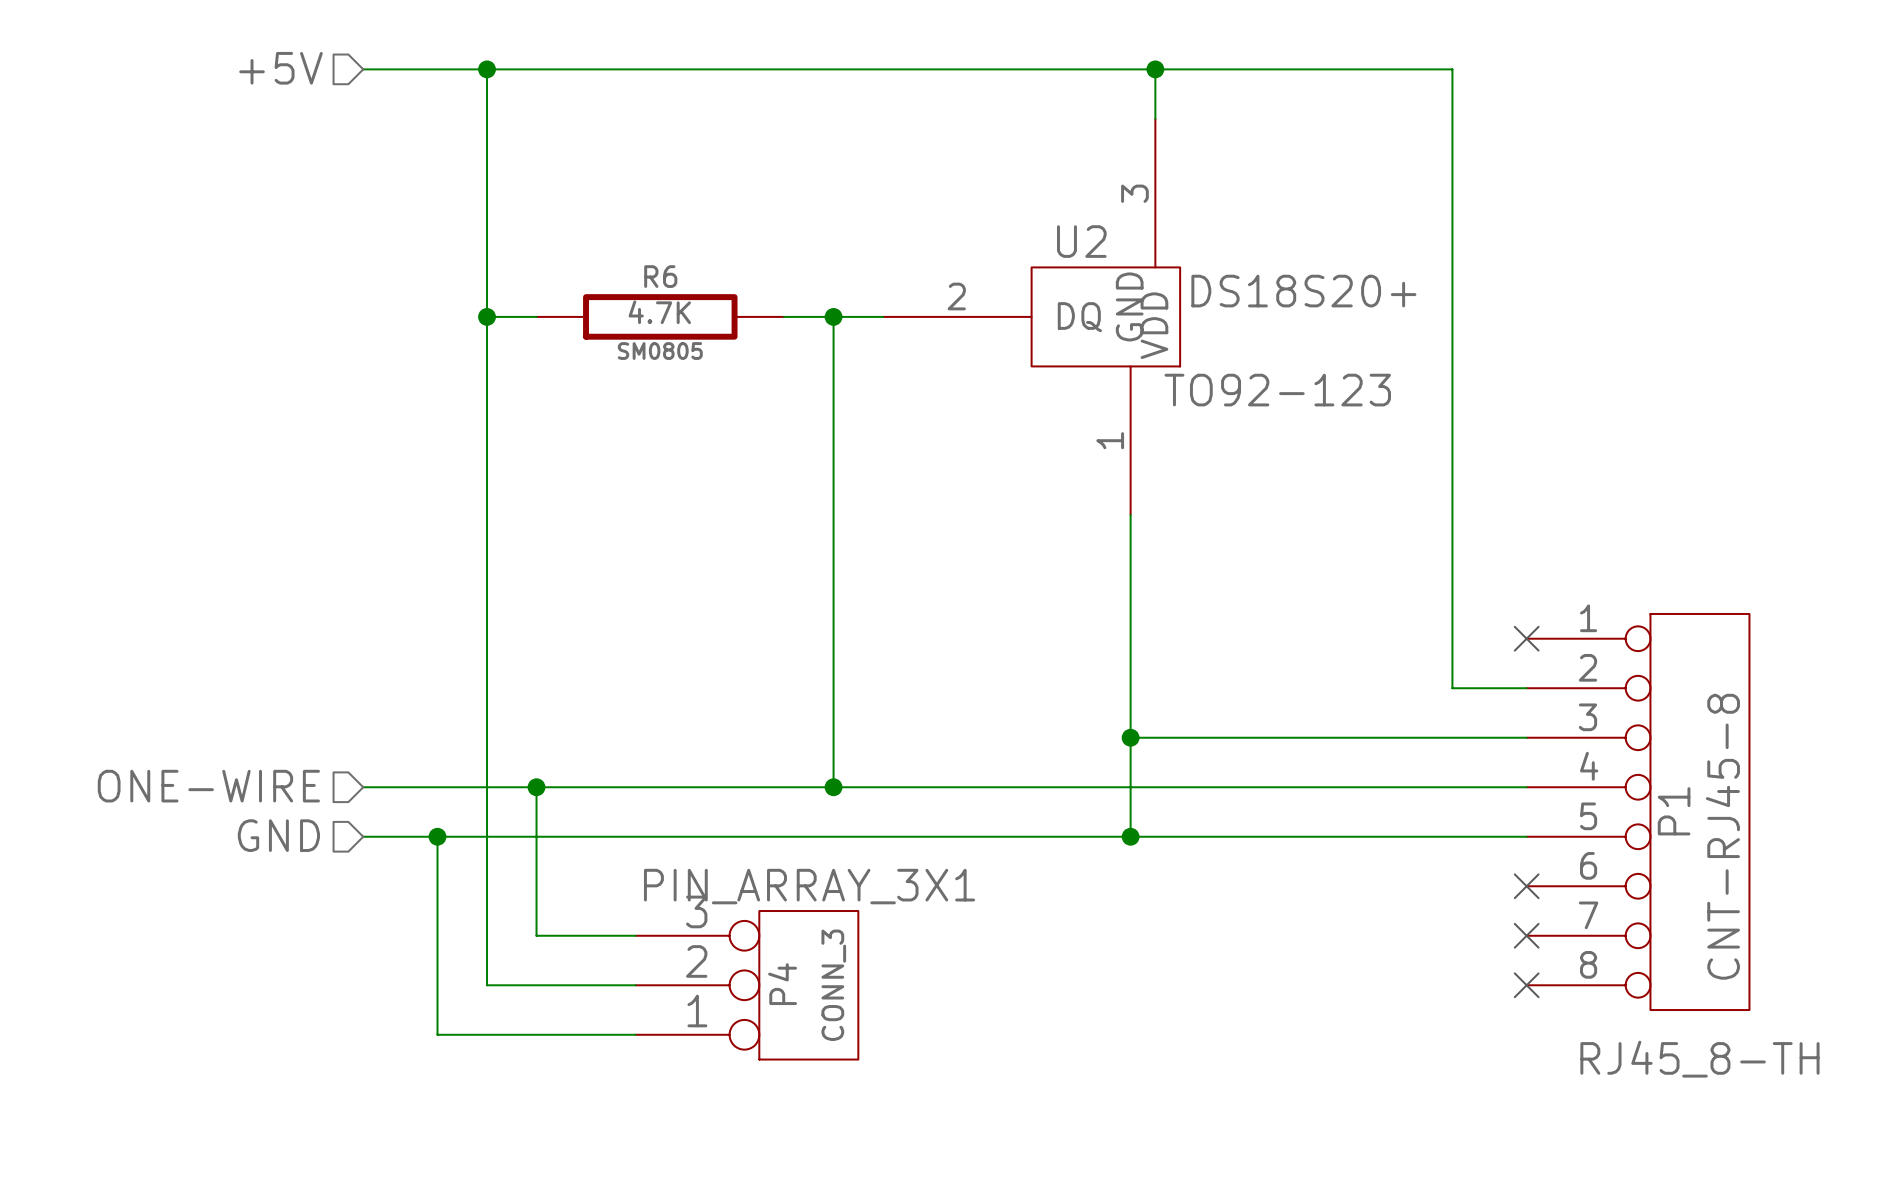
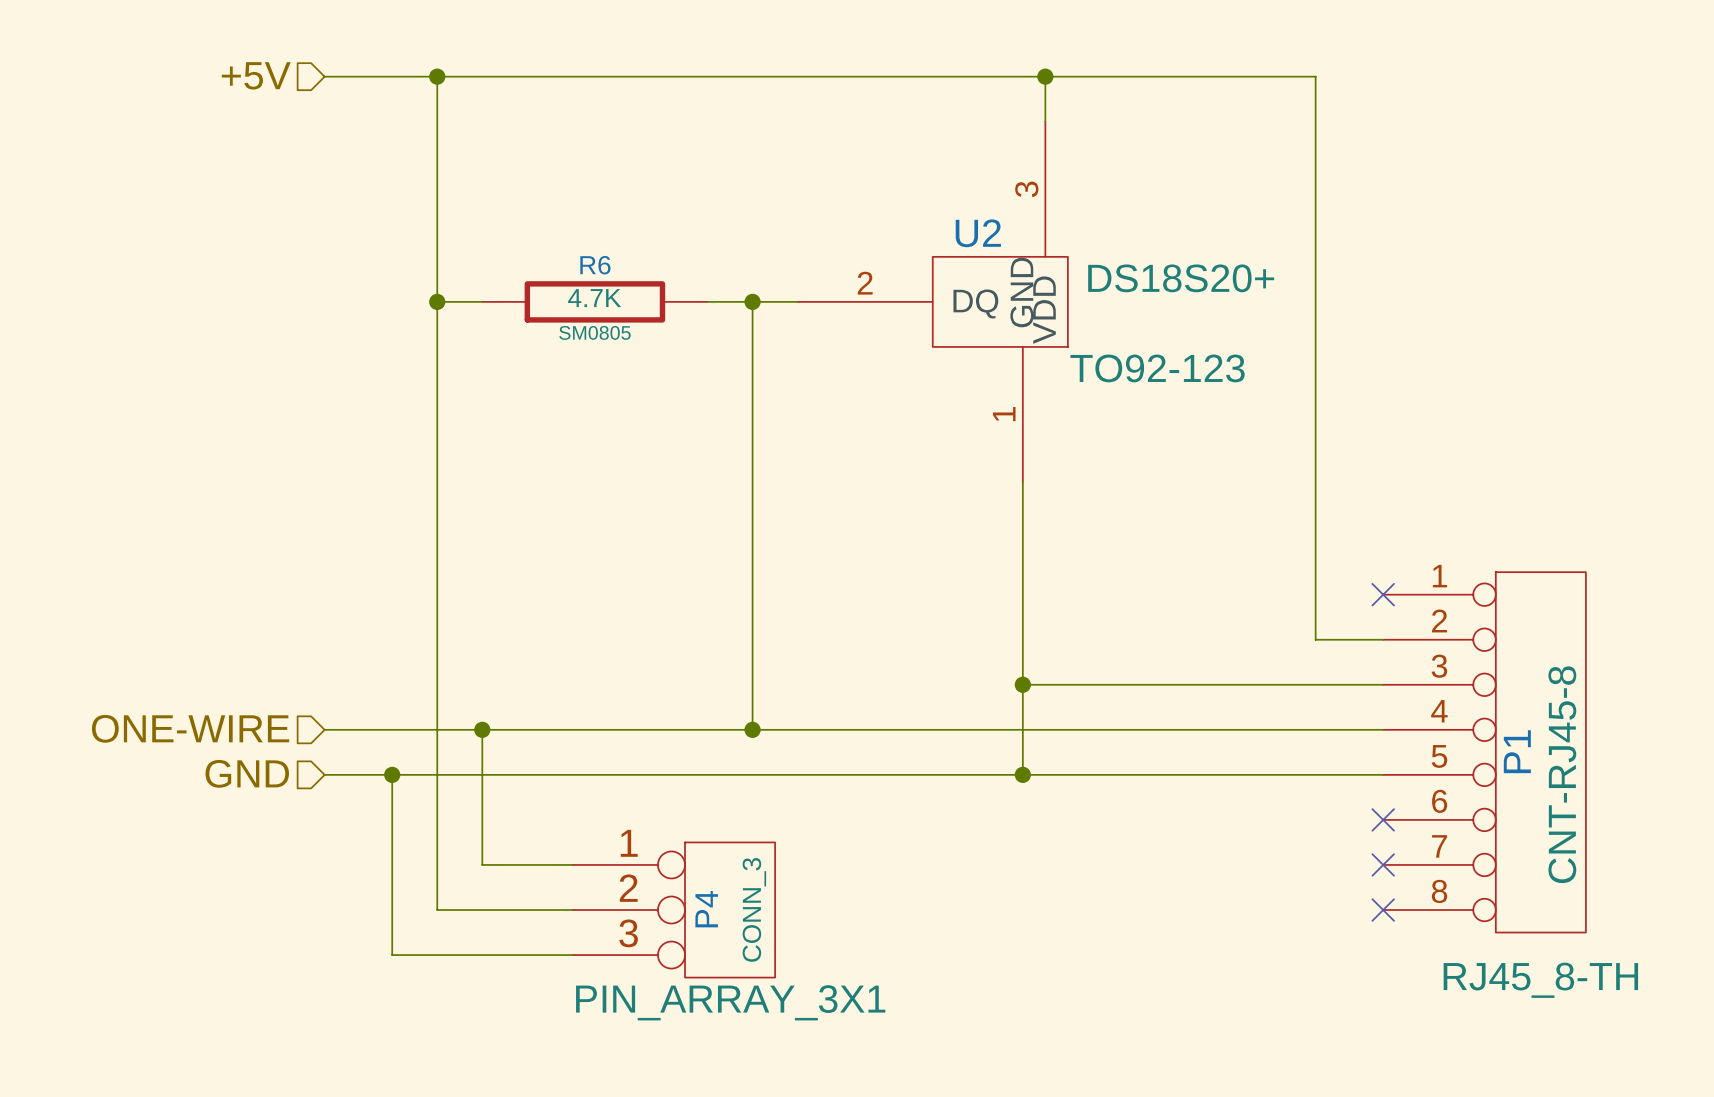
P4 flip: as is (808, 985) -> up-down (730, 910)

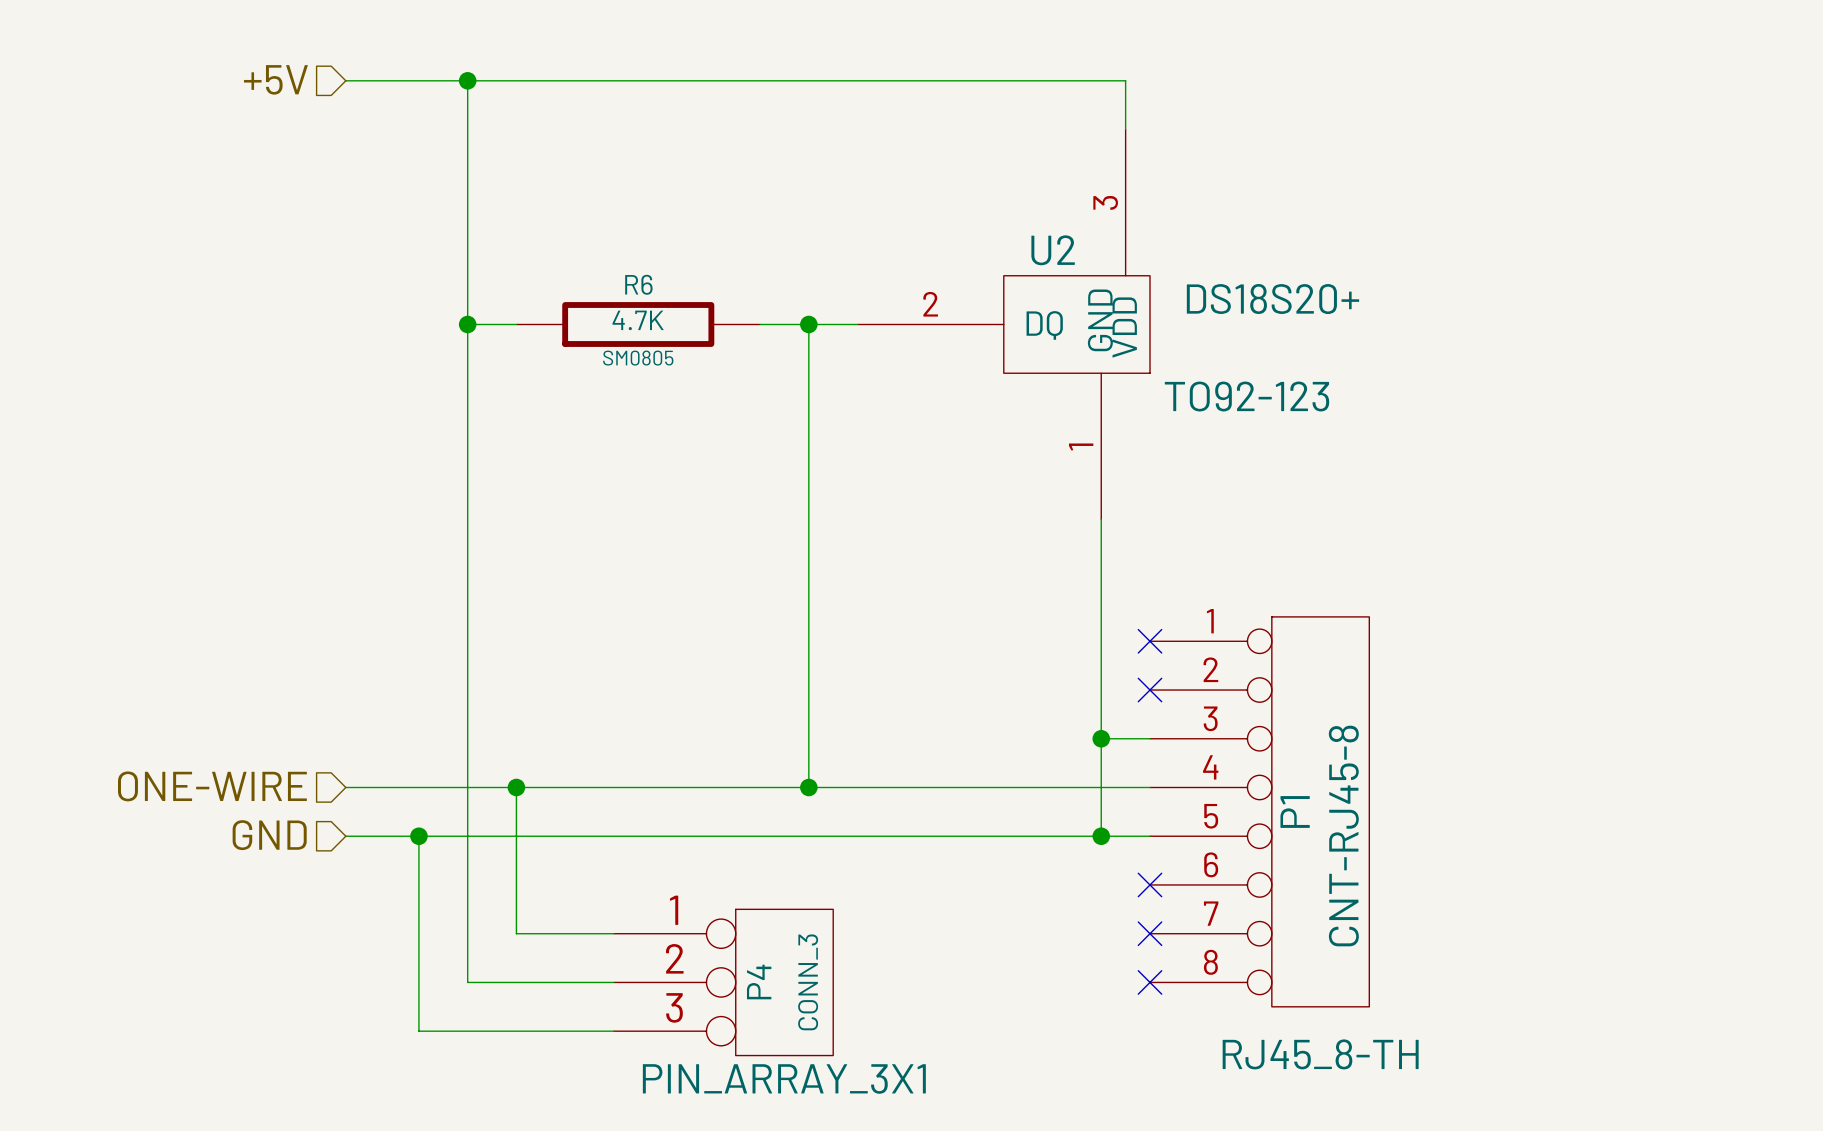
wire: (1045, 76) (1315, 76) (1315, 639) (1383, 639) -> none
junction: (1045, 76) -> none
no-connect mark: none -> (1150, 641)
no-connect mark: (1383, 594) -> none
no-connect mark: none -> (1150, 690)
wire: (1067, 684) (1383, 684) -> none
wire: (1067, 729) (1383, 729) -> none
P1 position: (1484, 752) -> (1259, 811)
wire: (1067, 774) (1383, 774) -> none
no-connect mark: none -> (1150, 884)
no-connect mark: (1383, 819) -> none
no-connect mark: none -> (1150, 933)
no-connect mark: (1383, 864) -> none
no-connect mark: none -> (1150, 982)
no-connect mark: (1383, 910) -> none

